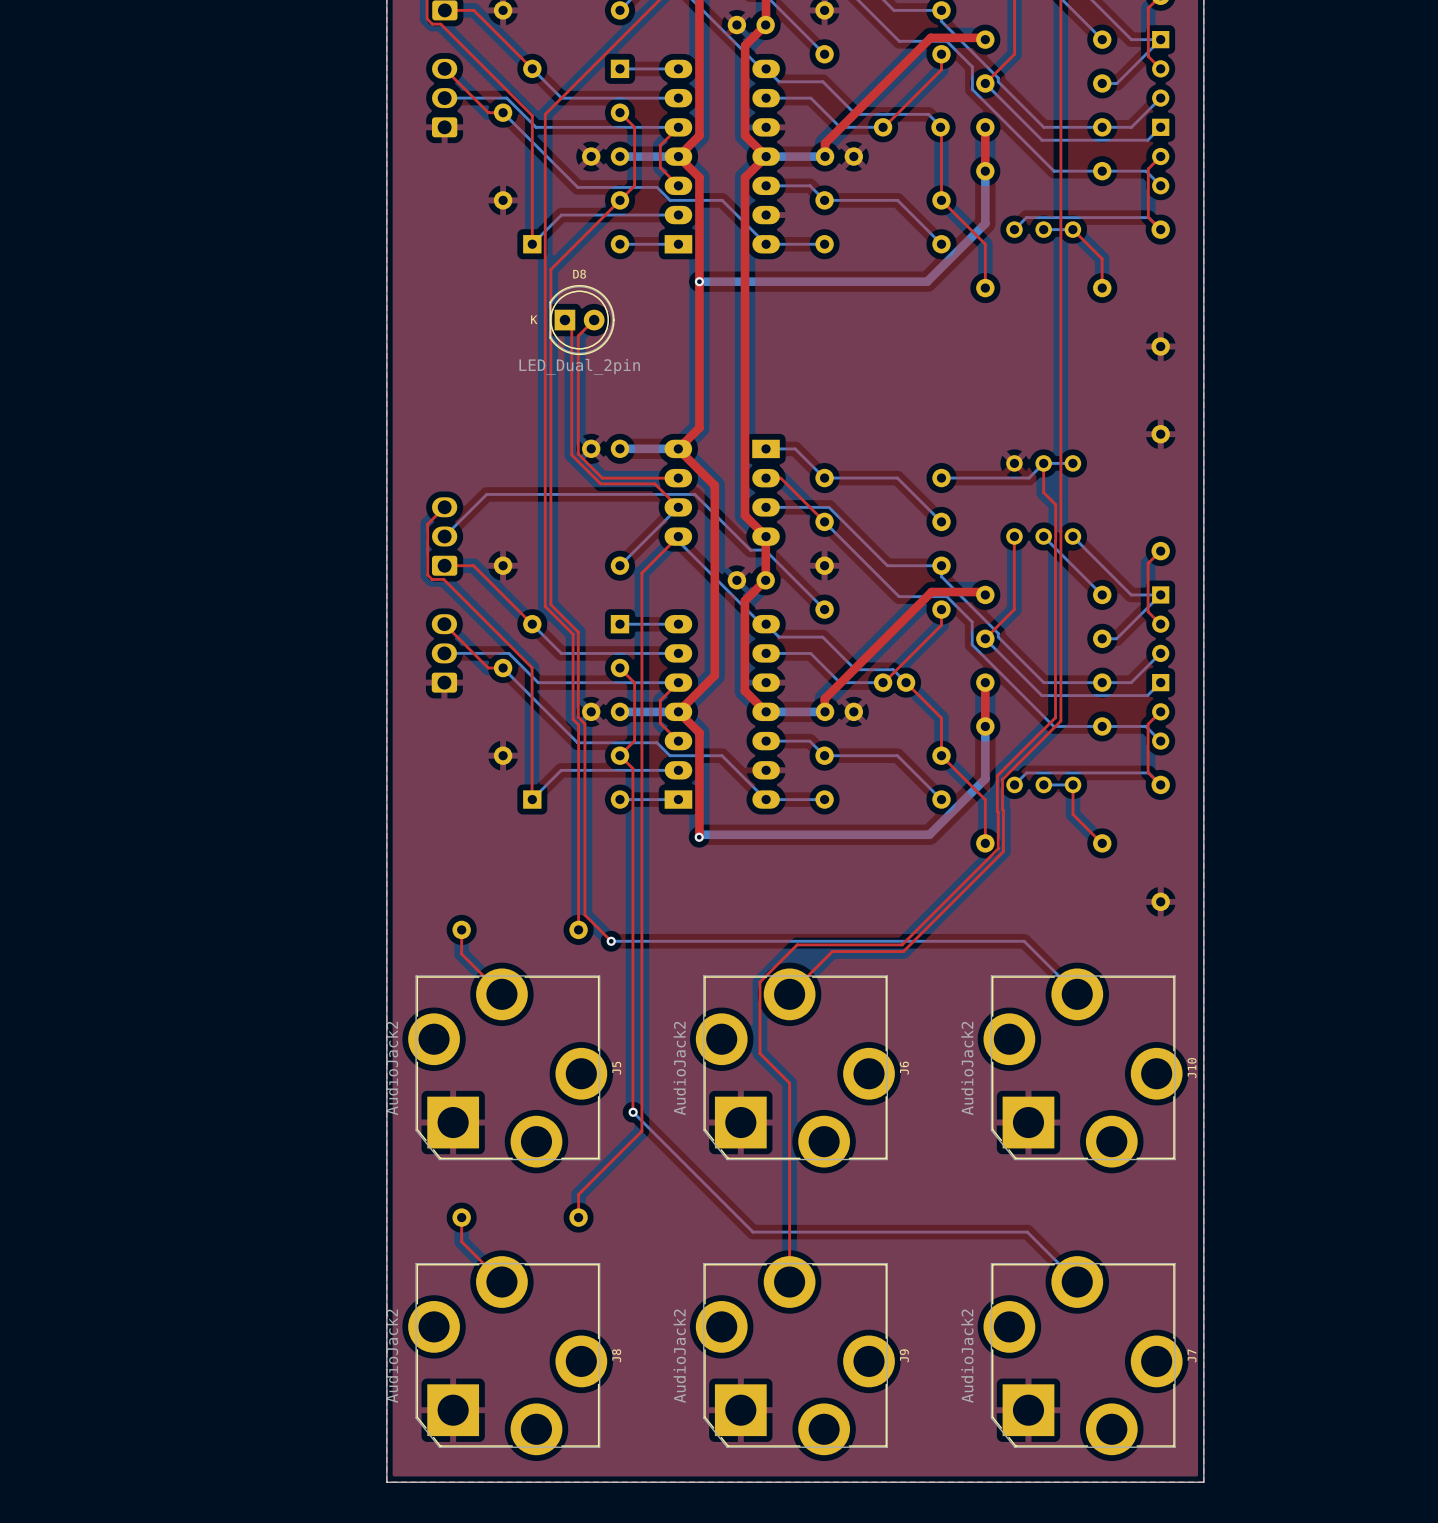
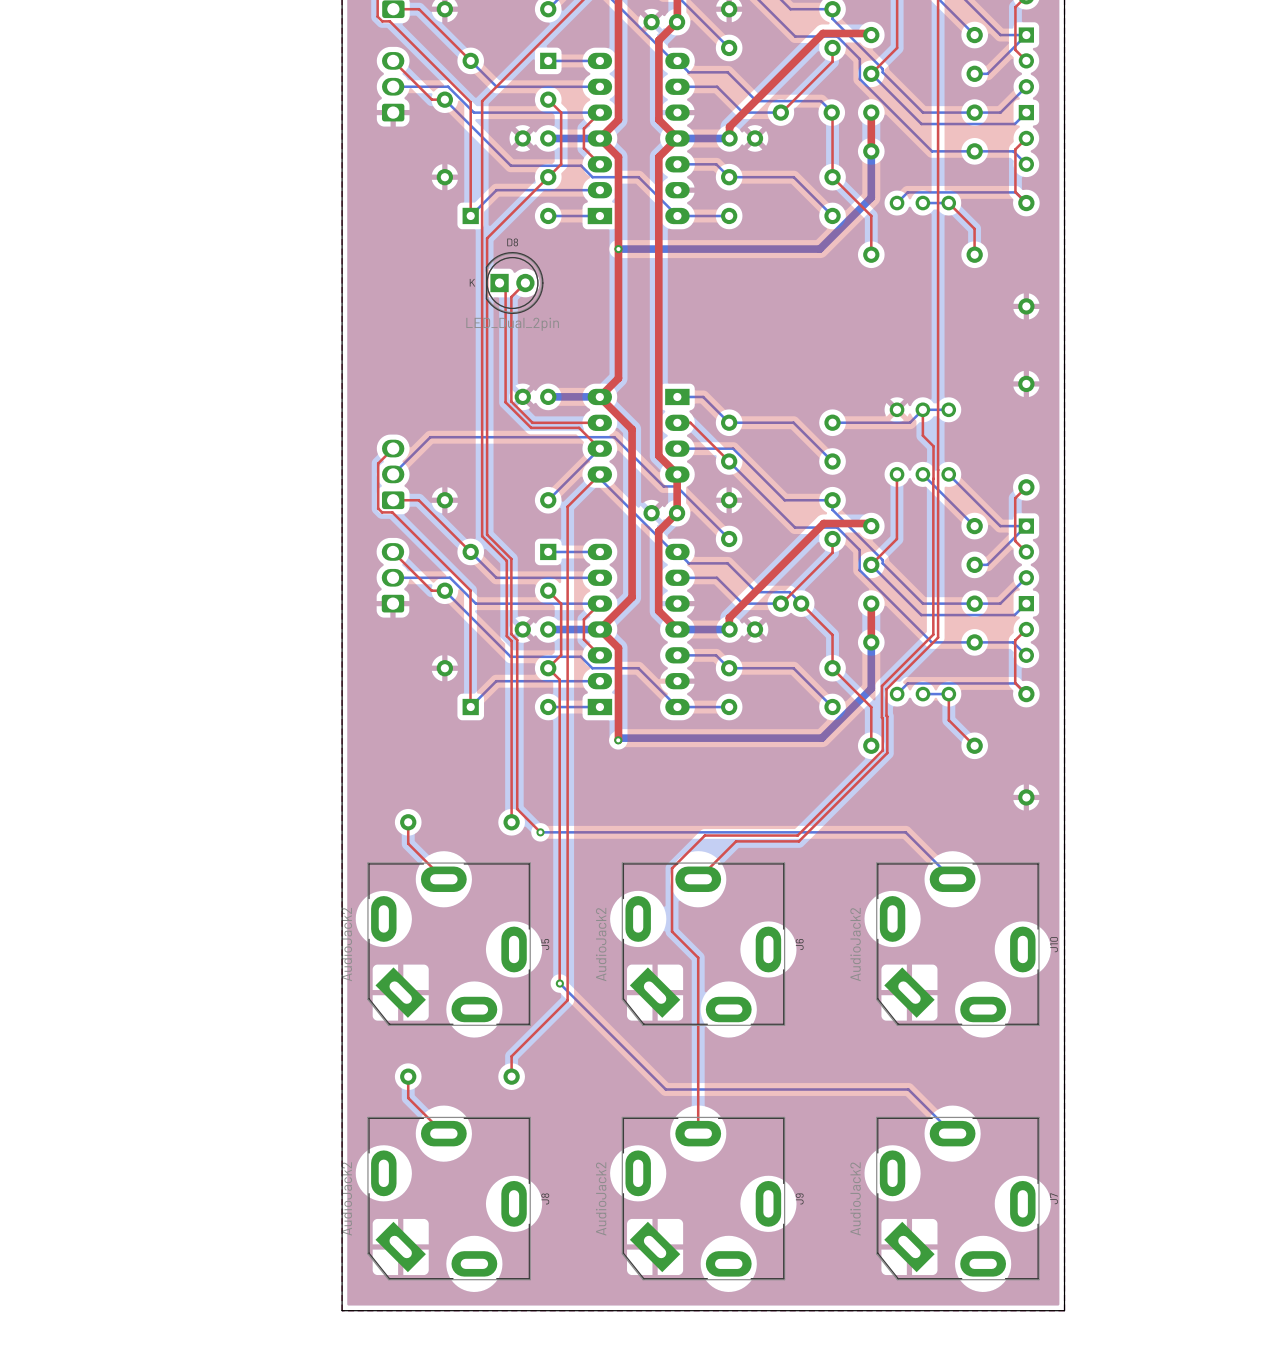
J5 footprint: [408, 968, 608, 1168] -> [367, 862, 531, 1026]
J6 footprint: [695, 968, 895, 1168] -> [621, 862, 786, 1026]
J10 footprint: [983, 968, 1183, 1168] -> [876, 862, 1040, 1026]
J8 footprint: [408, 1256, 608, 1456] -> [367, 1116, 531, 1281]
J9 footprint: [695, 1256, 895, 1456] -> [621, 1116, 786, 1281]
J7 footprint: [983, 1256, 1183, 1456] -> [876, 1116, 1040, 1281]

